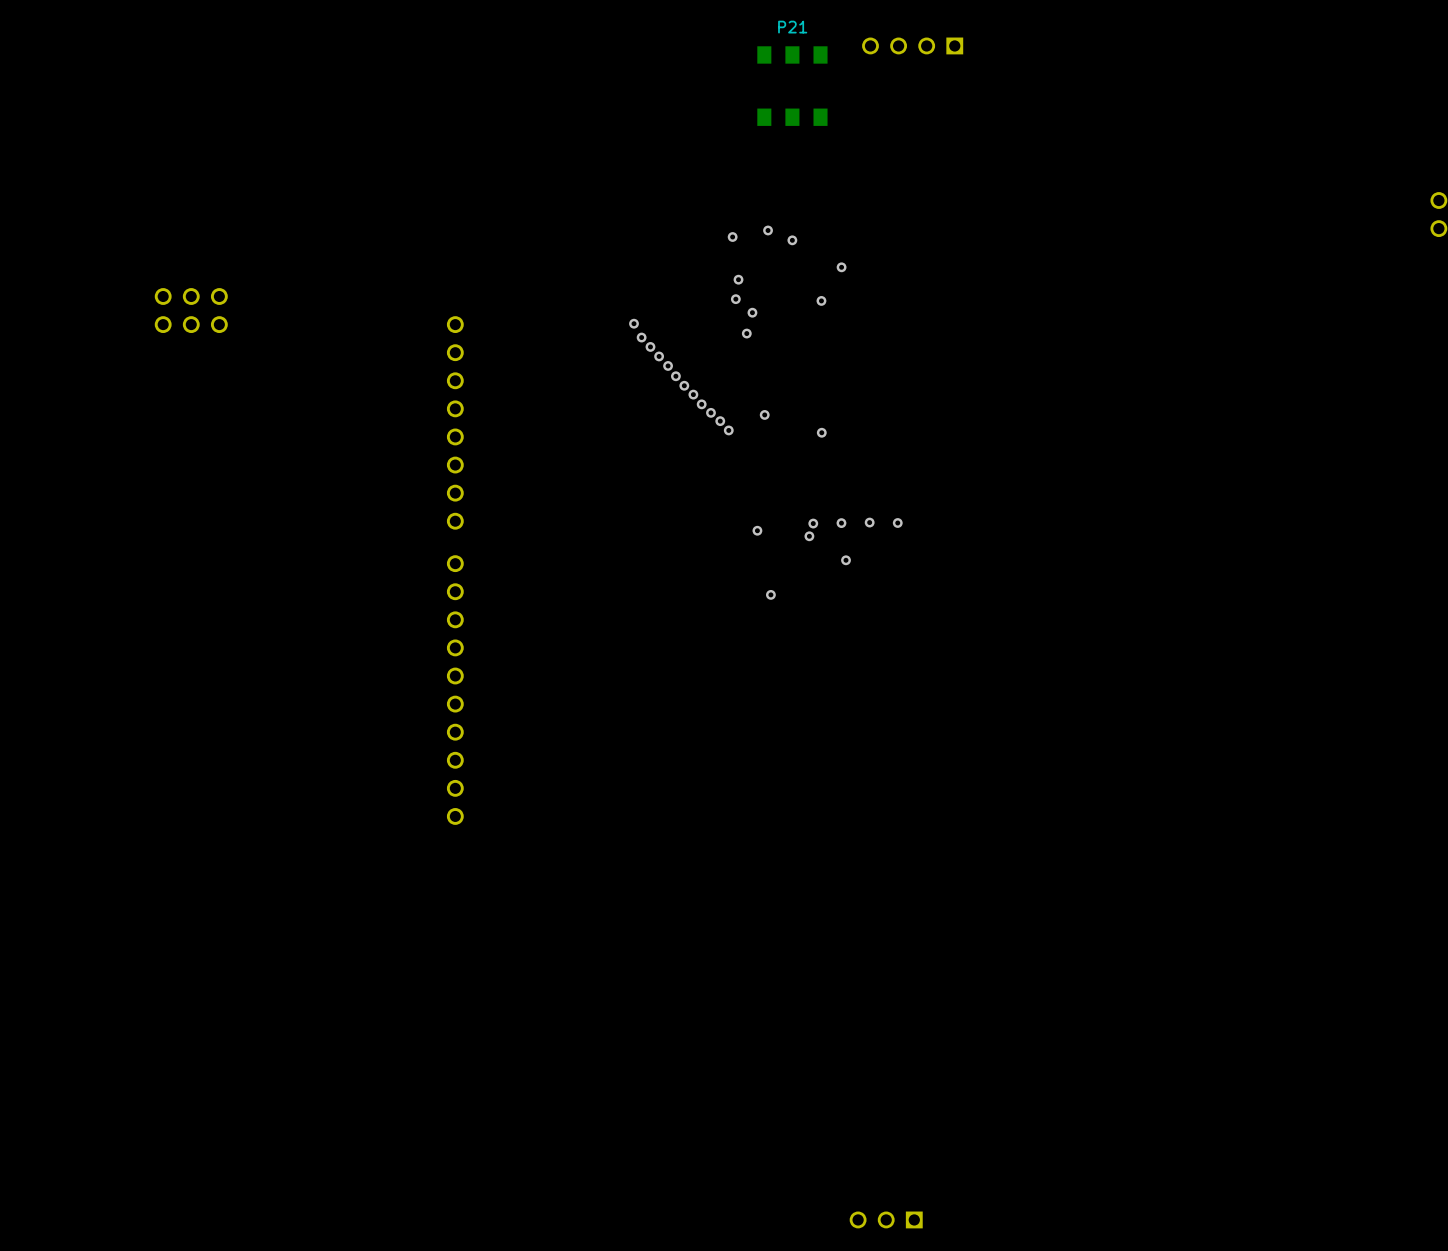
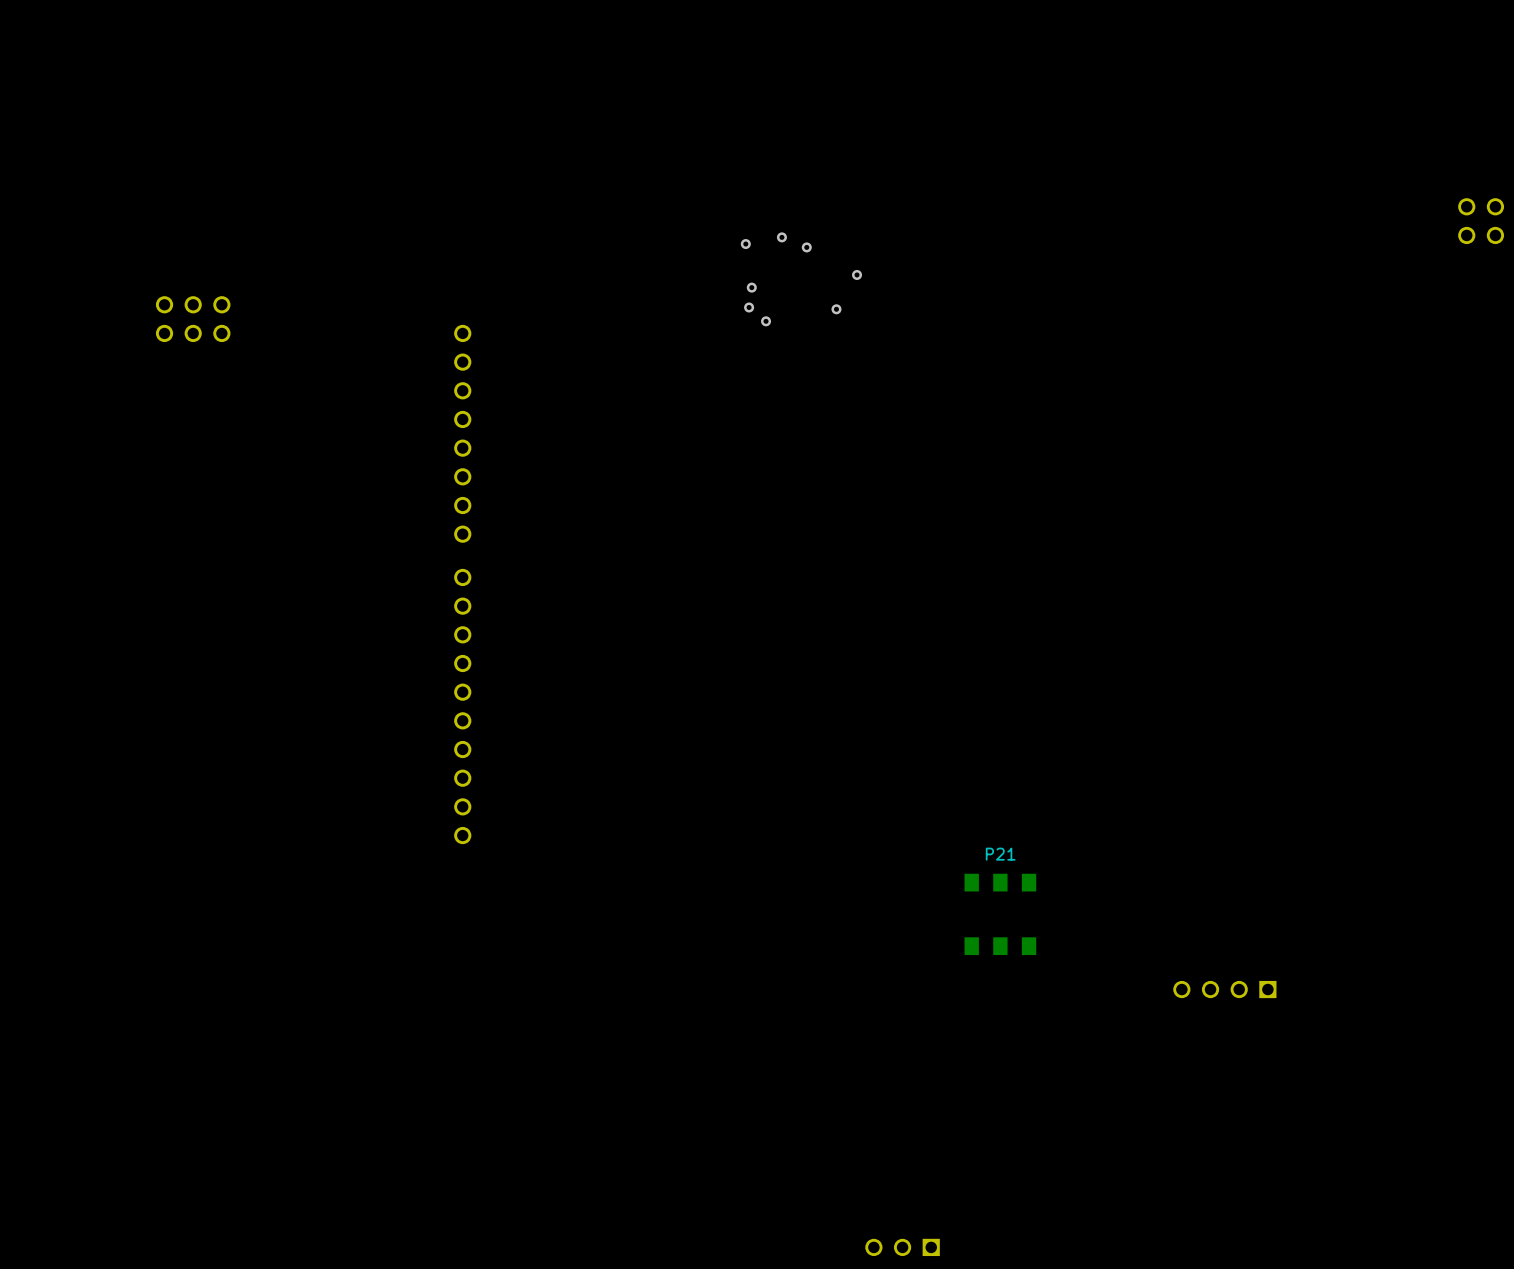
part: (912, 45) -> none
P21 position: (792, 86) -> (1000, 914)
via: (634, 323) -> none
via: (746, 333) -> none
via: (641, 337) -> none
via: (650, 346) -> none
via: (659, 356) -> none
via: (668, 365) -> none
via: (675, 376) -> none
via: (684, 385) -> none
via: (693, 394) -> none
via: (701, 404) -> none
via: (710, 412) -> none
via: (764, 414) -> none
via: (720, 421) -> none
via: (728, 430) -> none
via: (821, 432) -> none
via: (869, 522) -> none
via: (813, 523) -> none
via: (841, 523) -> none
via: (897, 523) -> none
via: (757, 530) -> none
via: (809, 536) -> none
via: (846, 560) -> none
via: (770, 594) -> none
part: none -> (1224, 989)

